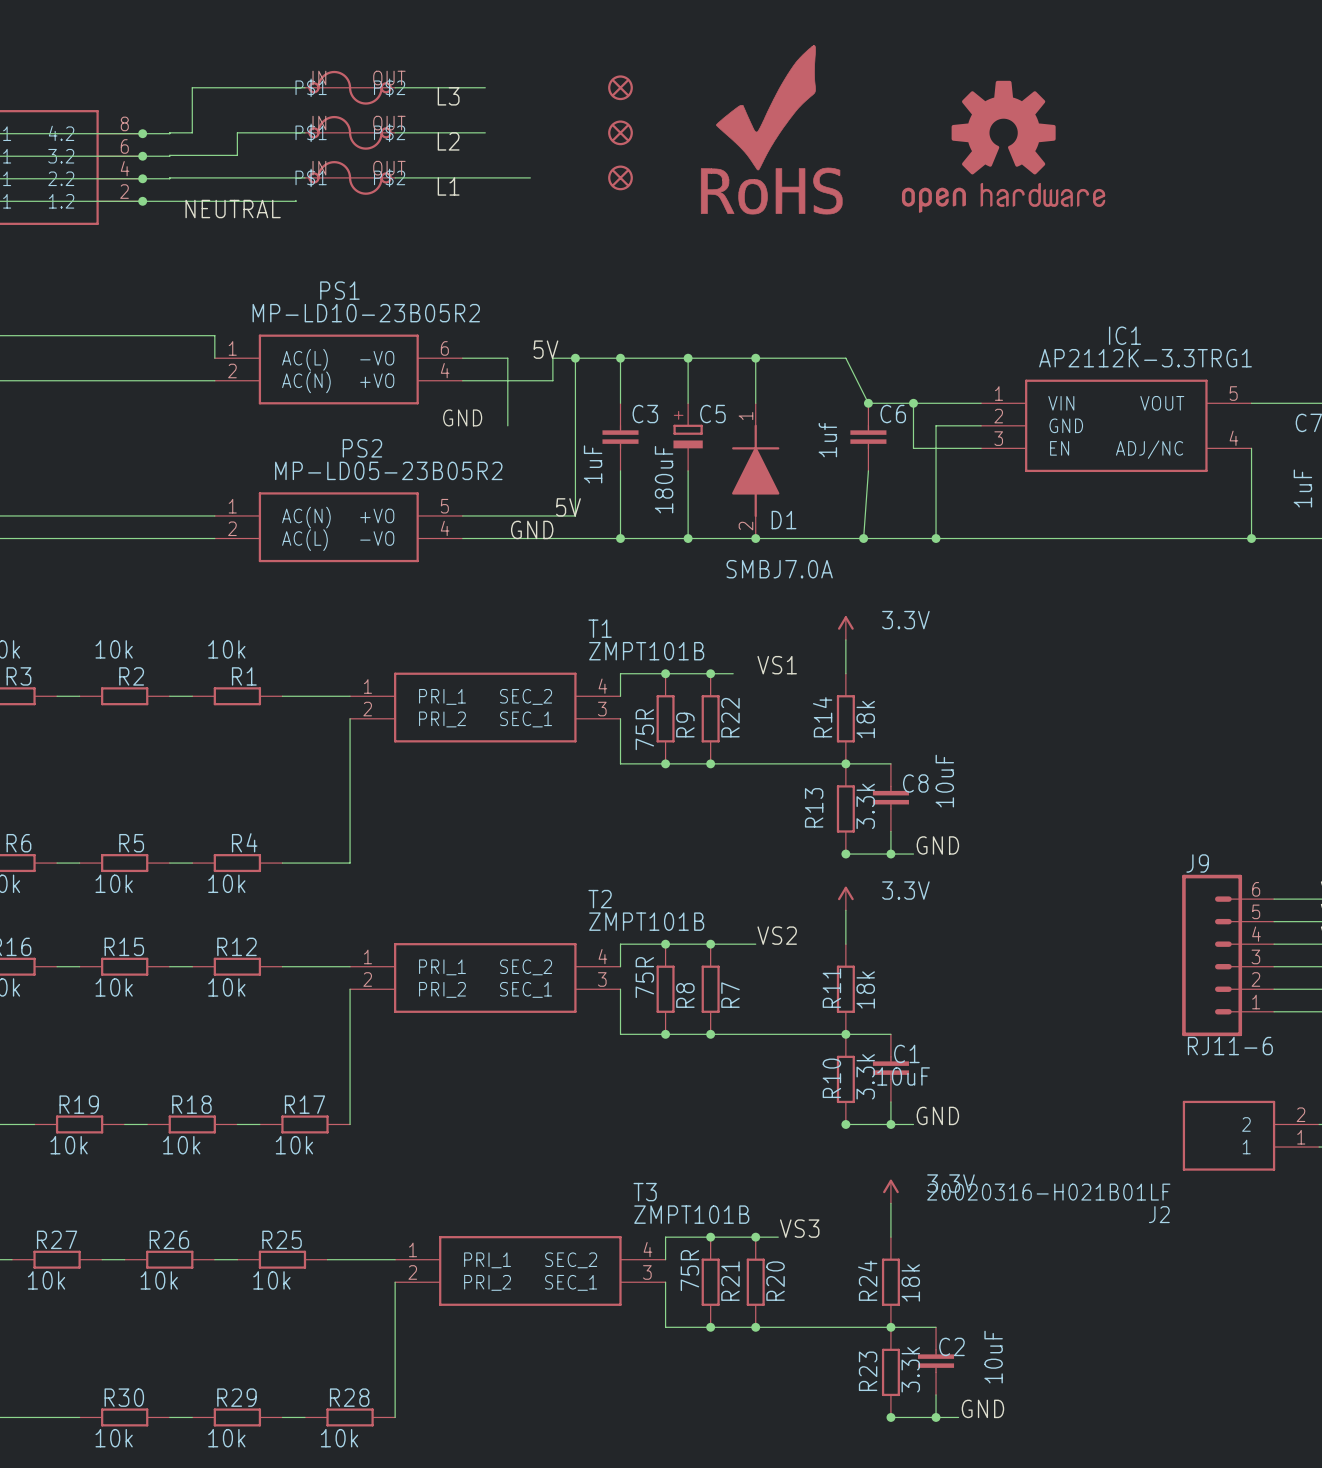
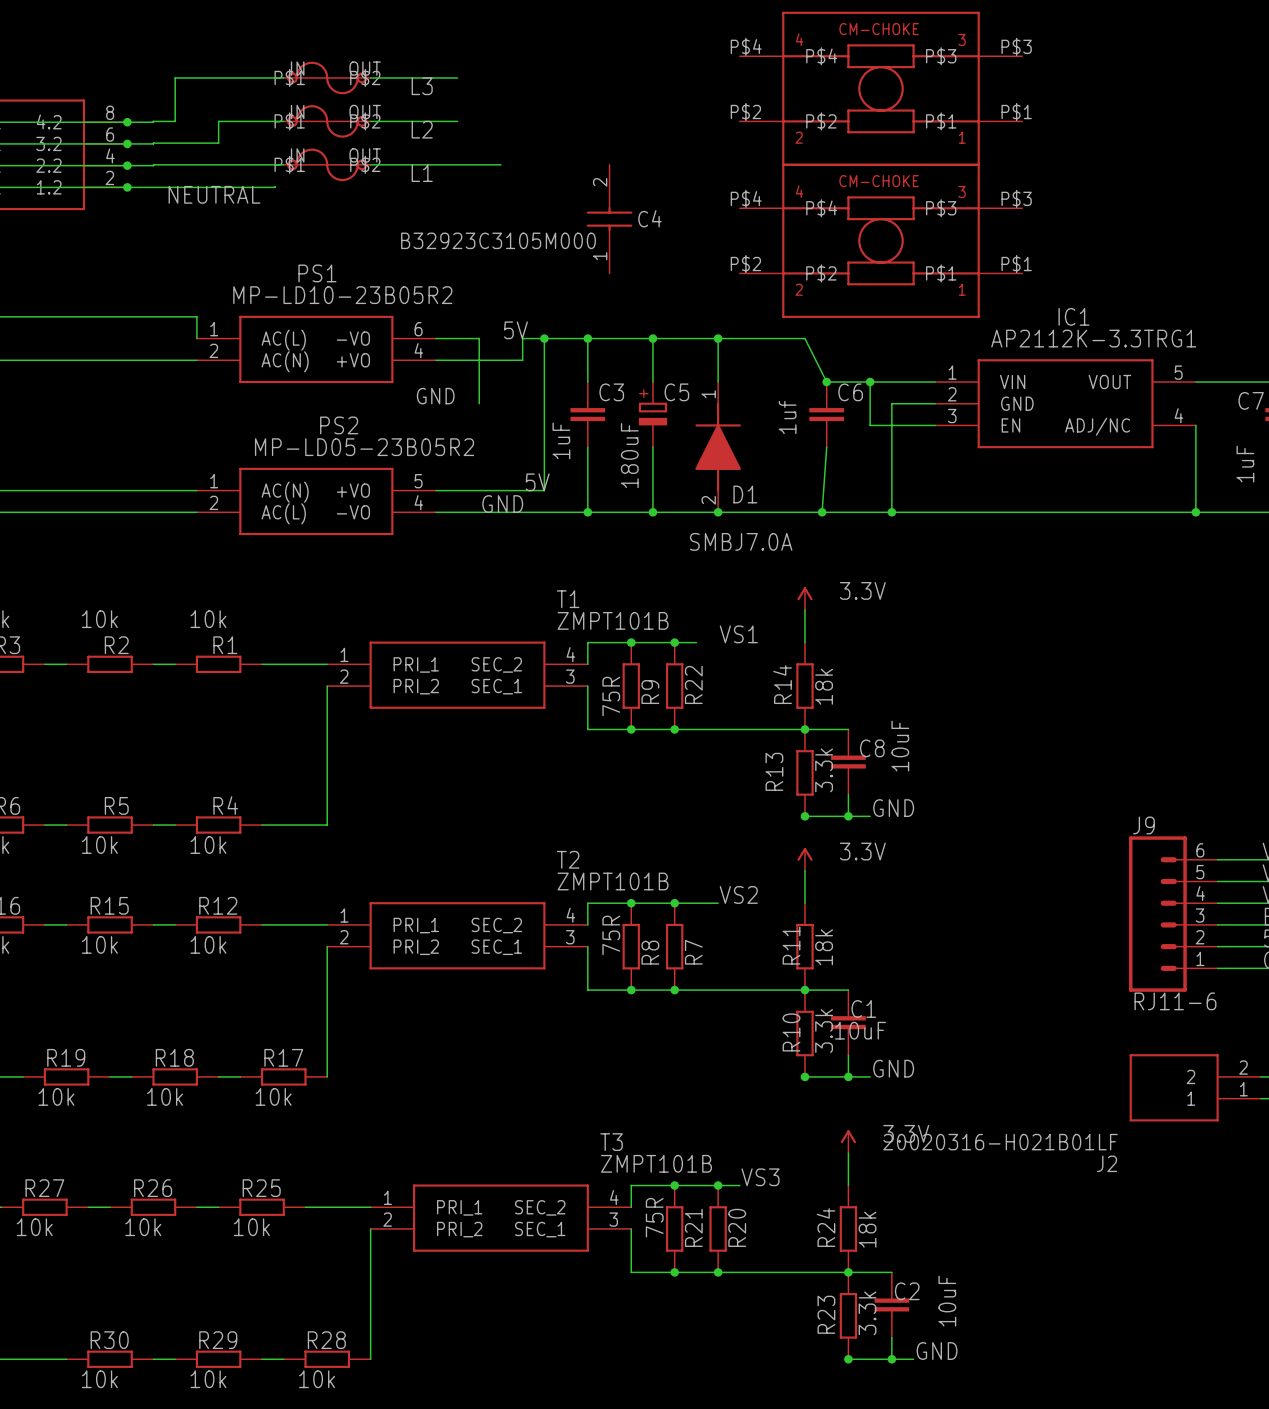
part: (620, 87) -> none
part: none -> (880, 88)
part: (771, 129) -> none
part: (620, 132) -> none
part: (1003, 146) -> none
part: (620, 177) -> none
C4: none -> B32923C3105M000 (609, 219)
part: none -> (880, 240)

